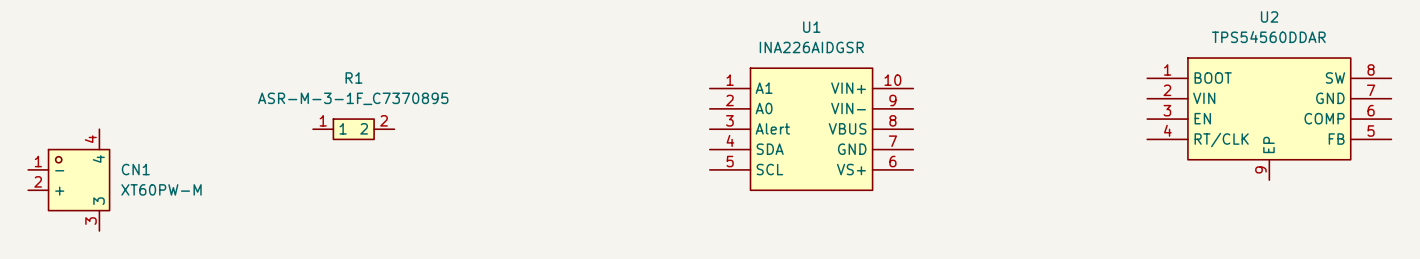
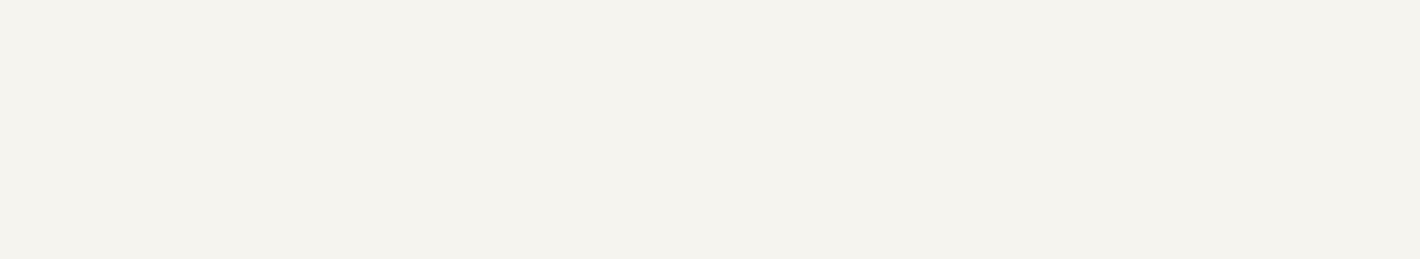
U2: TPS54560DDAR (1269, 119) -> none
R1: ASR-M-3-1F_C7370895 (353, 129) -> none
U1: INA226AIDGSR (811, 129) -> none
CN1: XT60PW-M (68, 180) -> none

